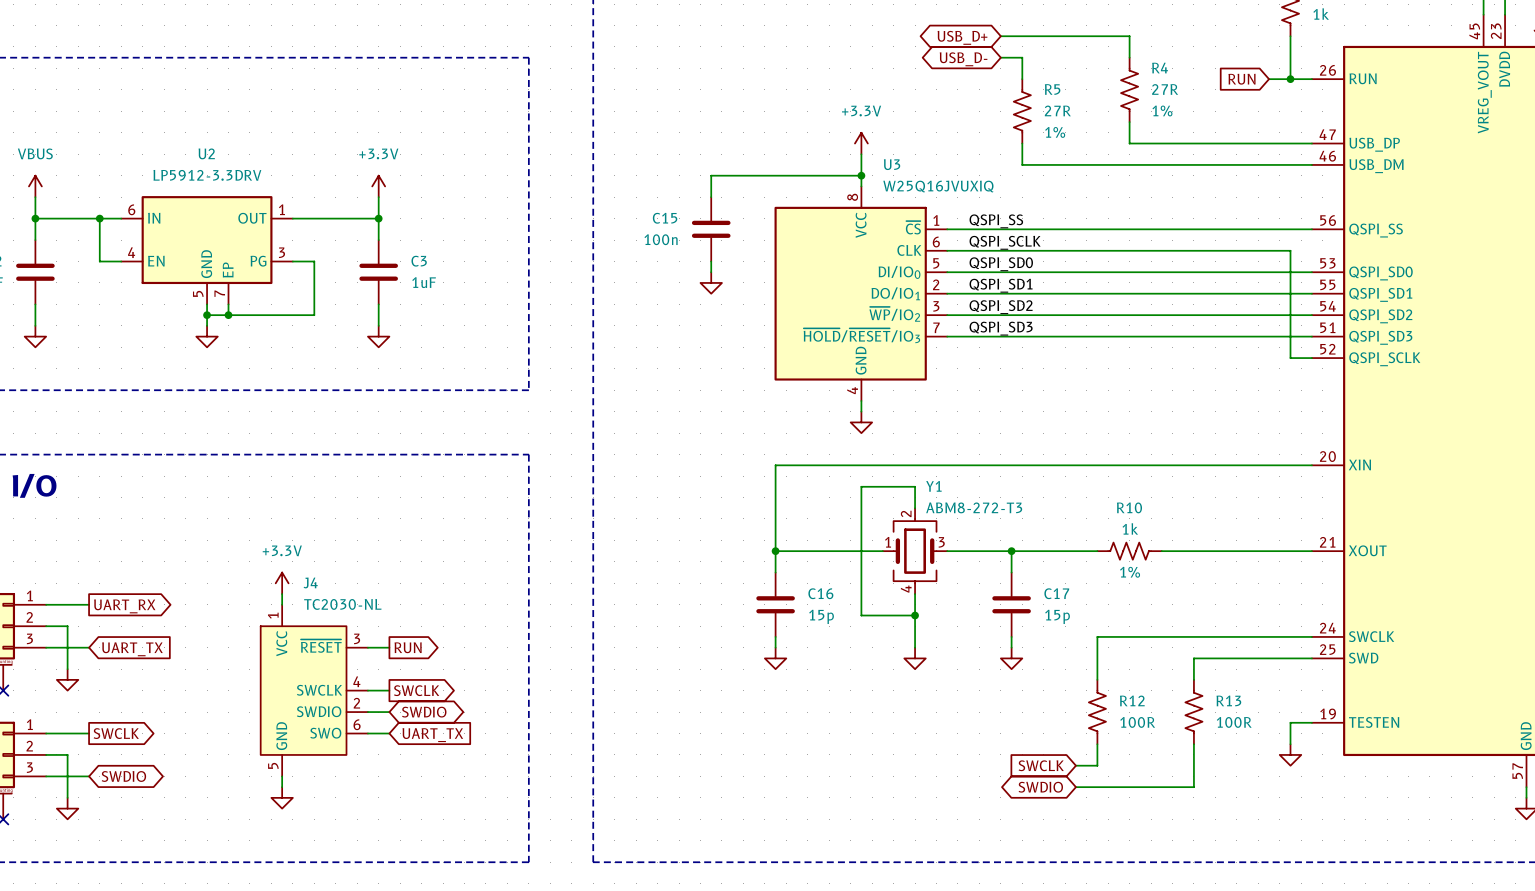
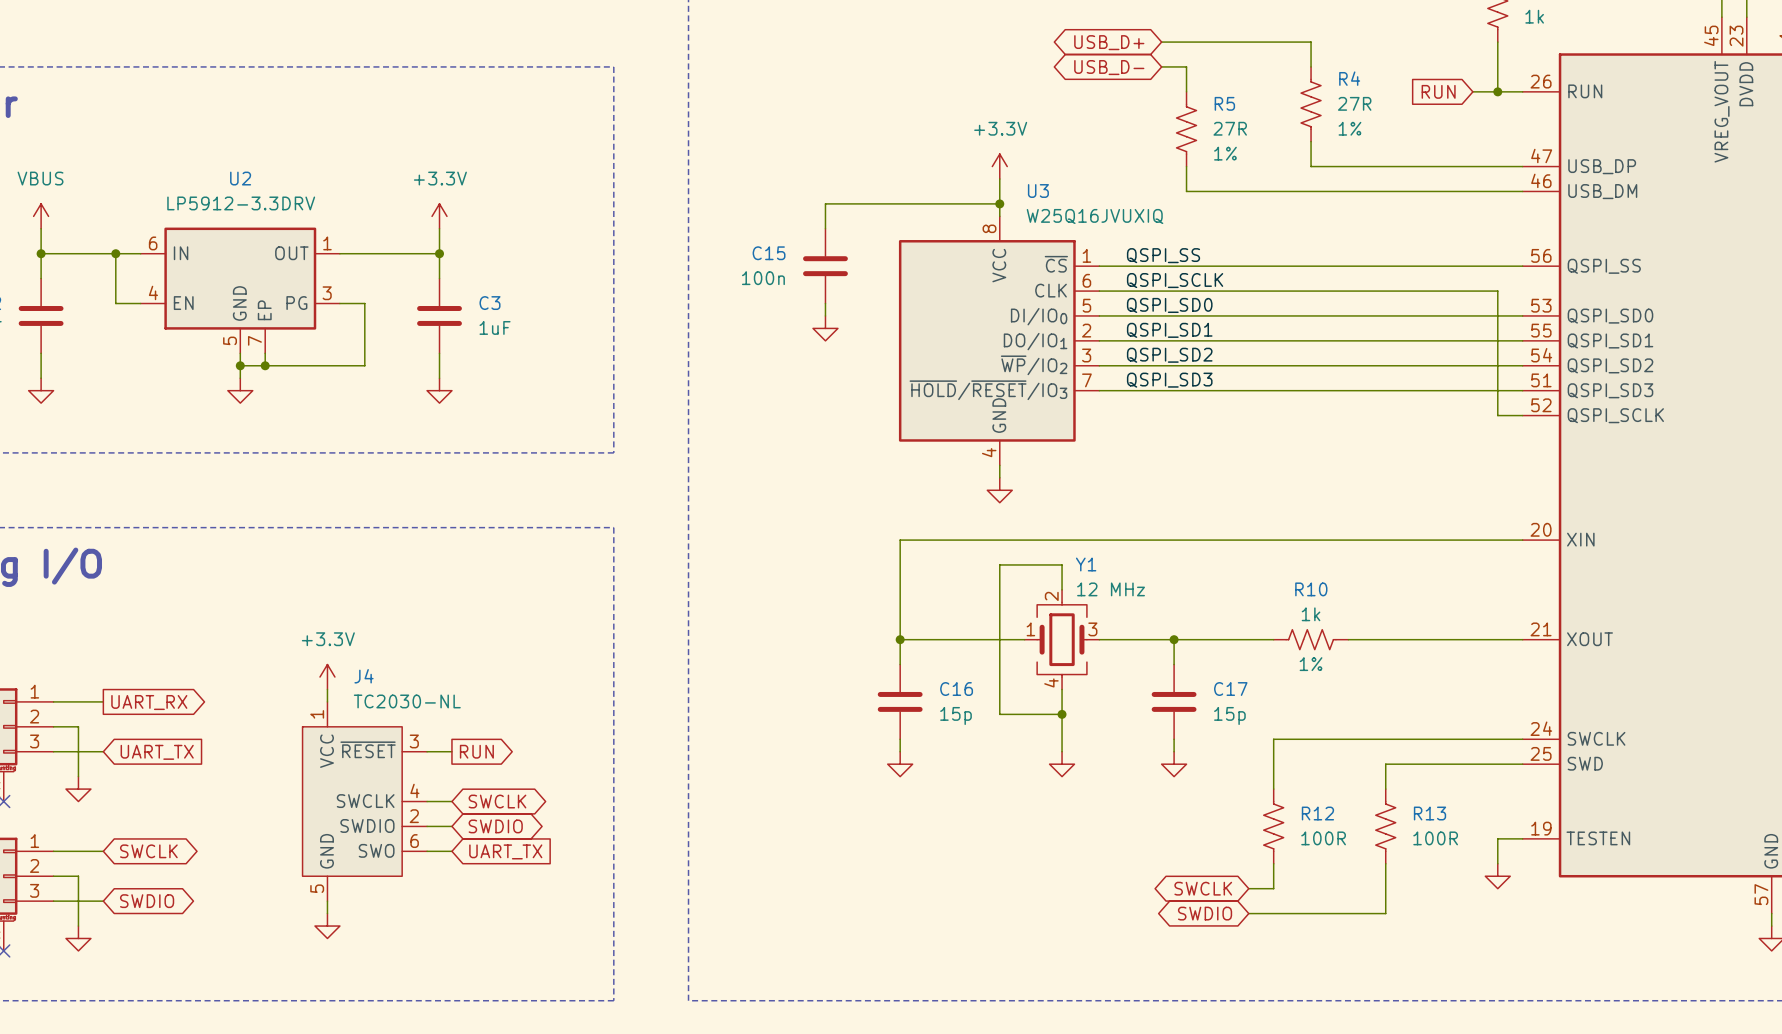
Y1 value: ABM8-272-T3 (974, 507) -> 12 MHz (1111, 589)
global label shape: output (416, 690) -> bidirectional (497, 801)
global label shape: output (116, 733) -> bidirectional (148, 851)
global label shape: input (1041, 765) -> bidirectional (1203, 888)

